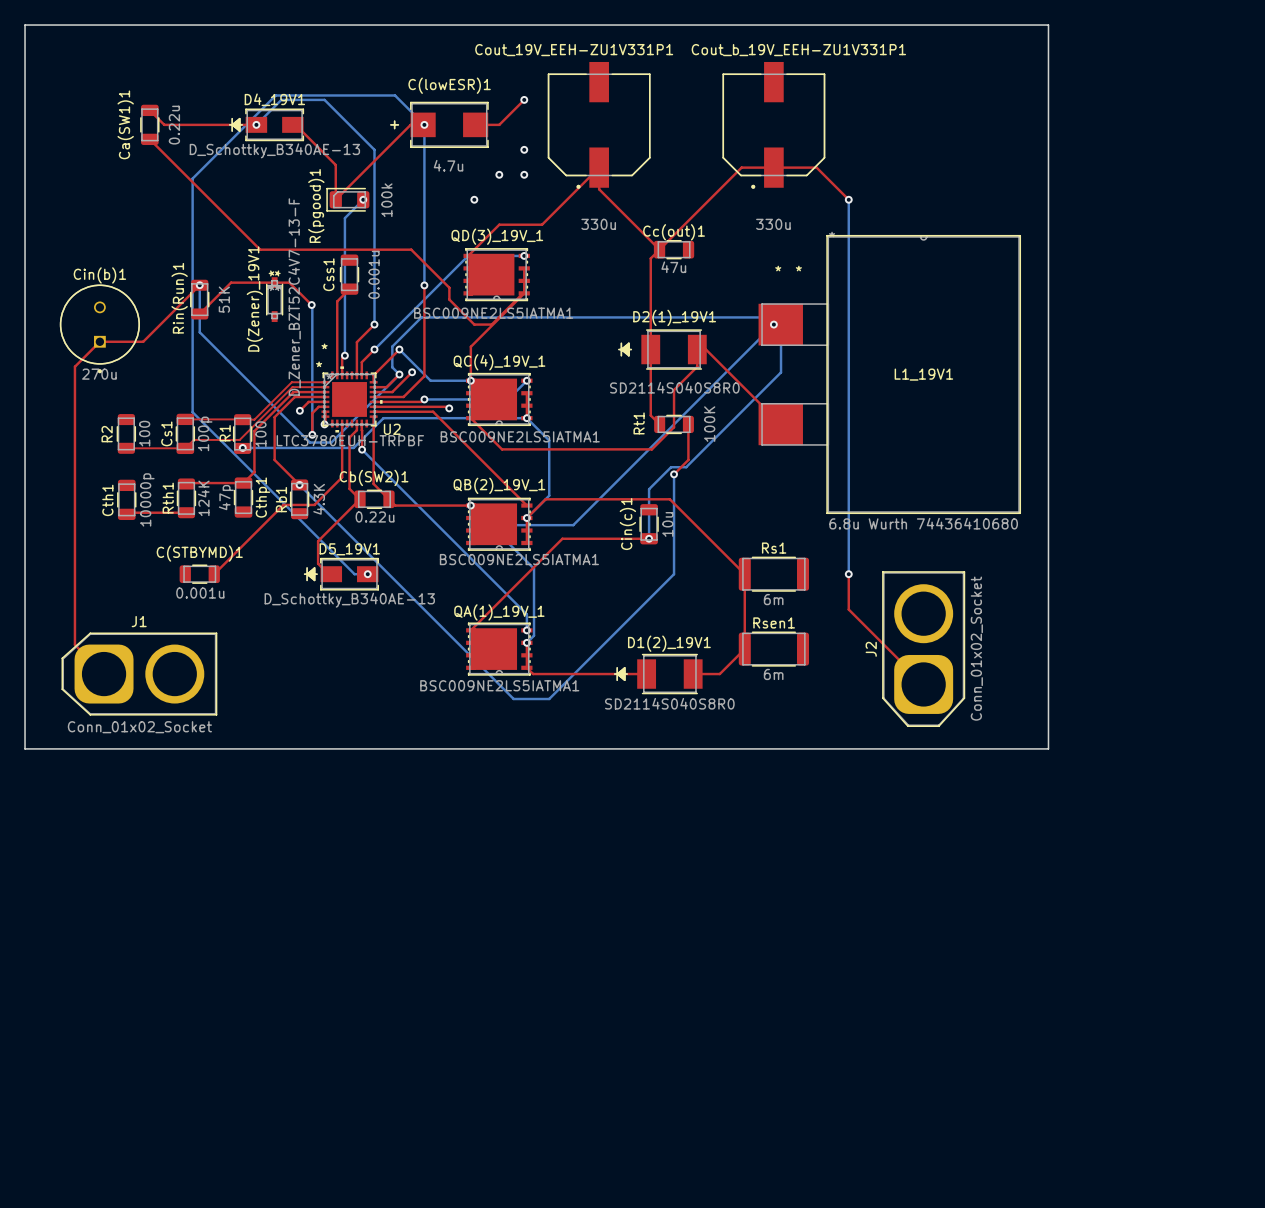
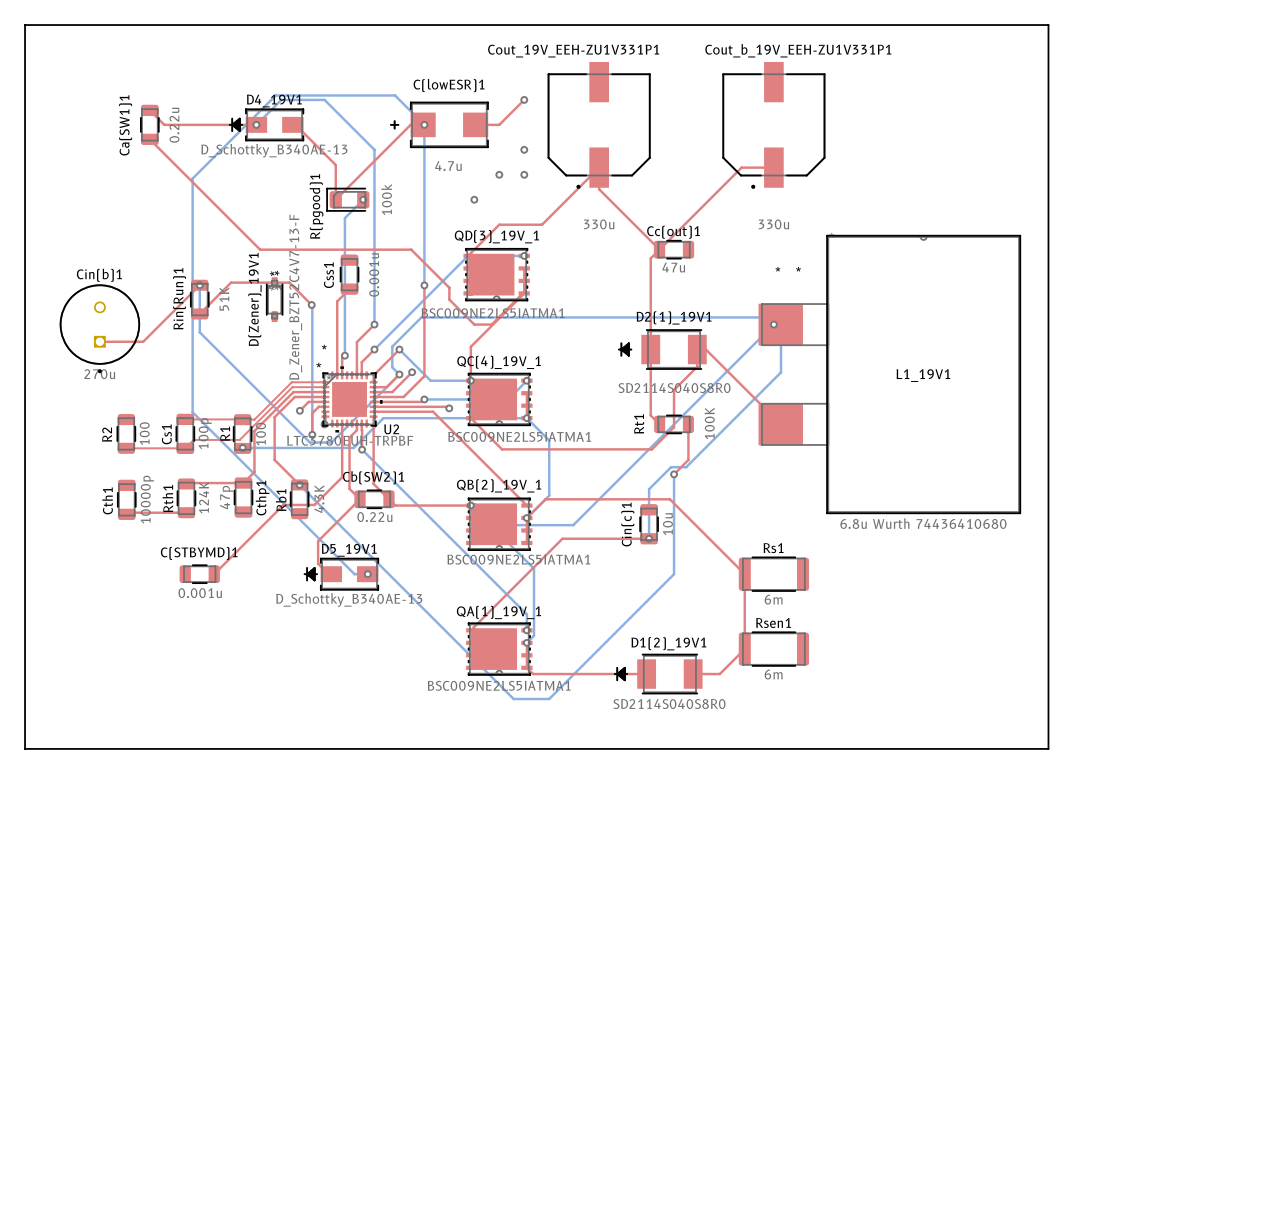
top track: (773, 167) (816, 167) (848, 199) -> none
bottom track: (848, 199) (848, 574) -> none
via: (848, 199) -> none
top track: (99, 341) (74, 366) (74, 644) (104, 674) -> none
top track: (848, 574) (848, 609) (923, 684) -> none
via: (848, 574) -> none
J2: Conn_01x02_Socket (923, 649) -> none
J1: Conn_01x02_Socket (139, 674) -> none

